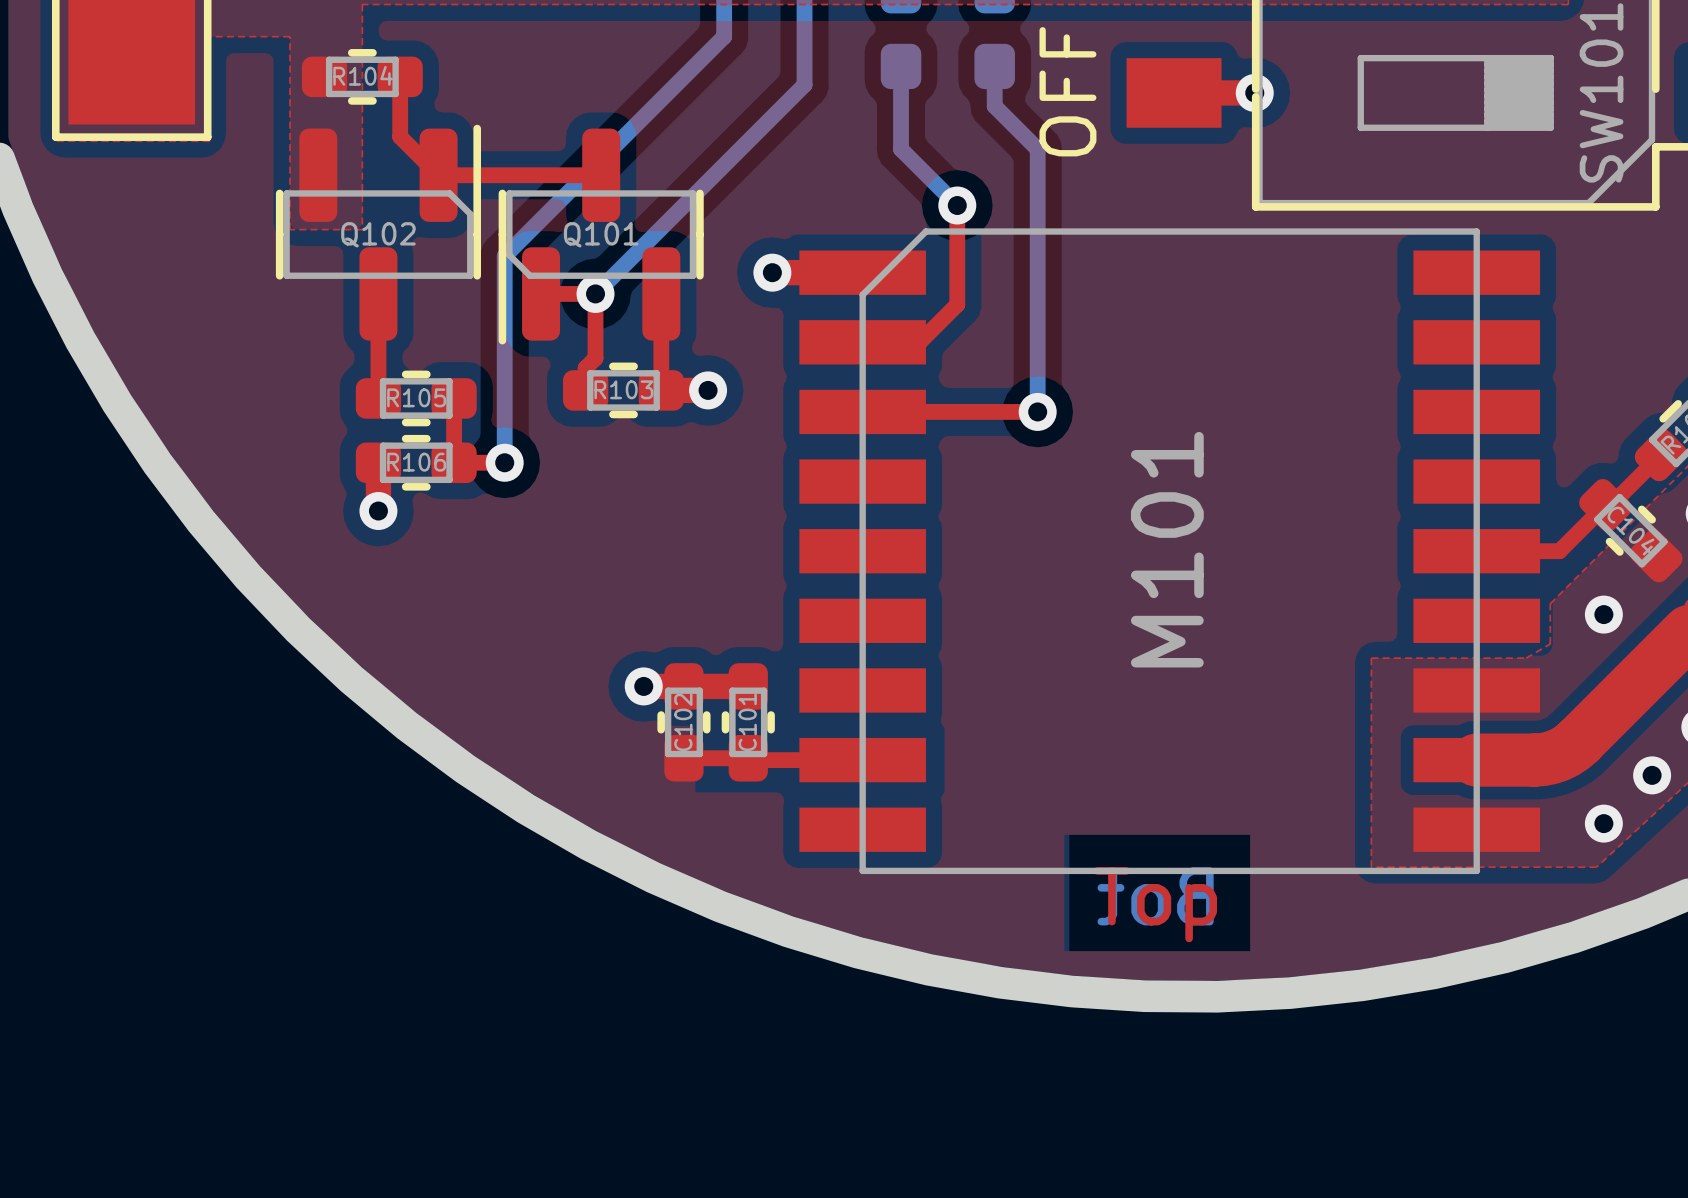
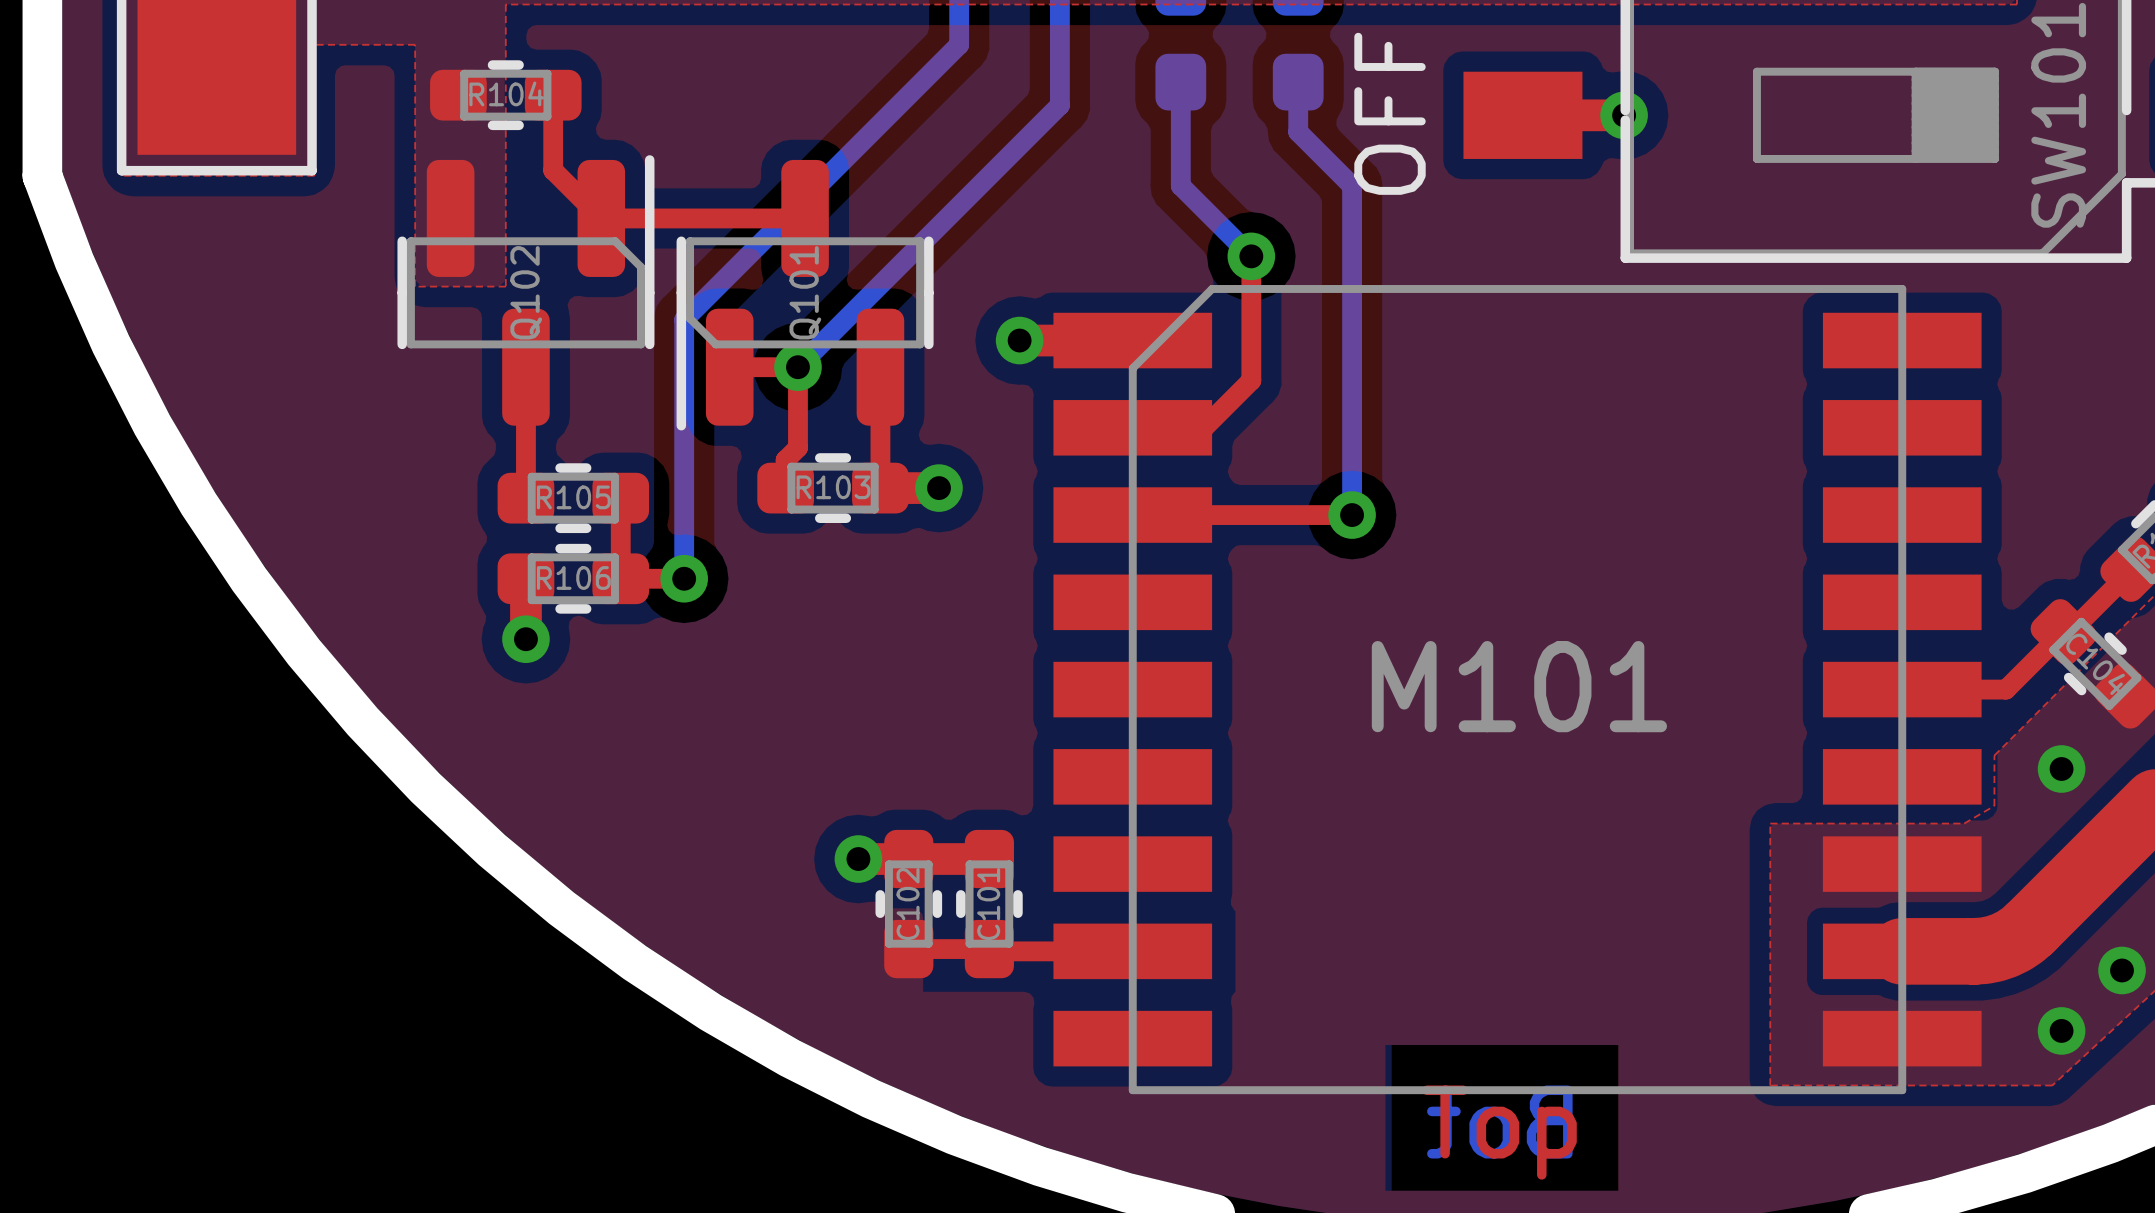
Q102 name rotation: 0° (378, 234) -> 90° counterclockwise (526, 292)
Q101 name rotation: 0° (601, 234) -> 90° counterclockwise (805, 292)
M101 name rotation: 0° (1167, 549) -> 90° clockwise (1519, 686)

